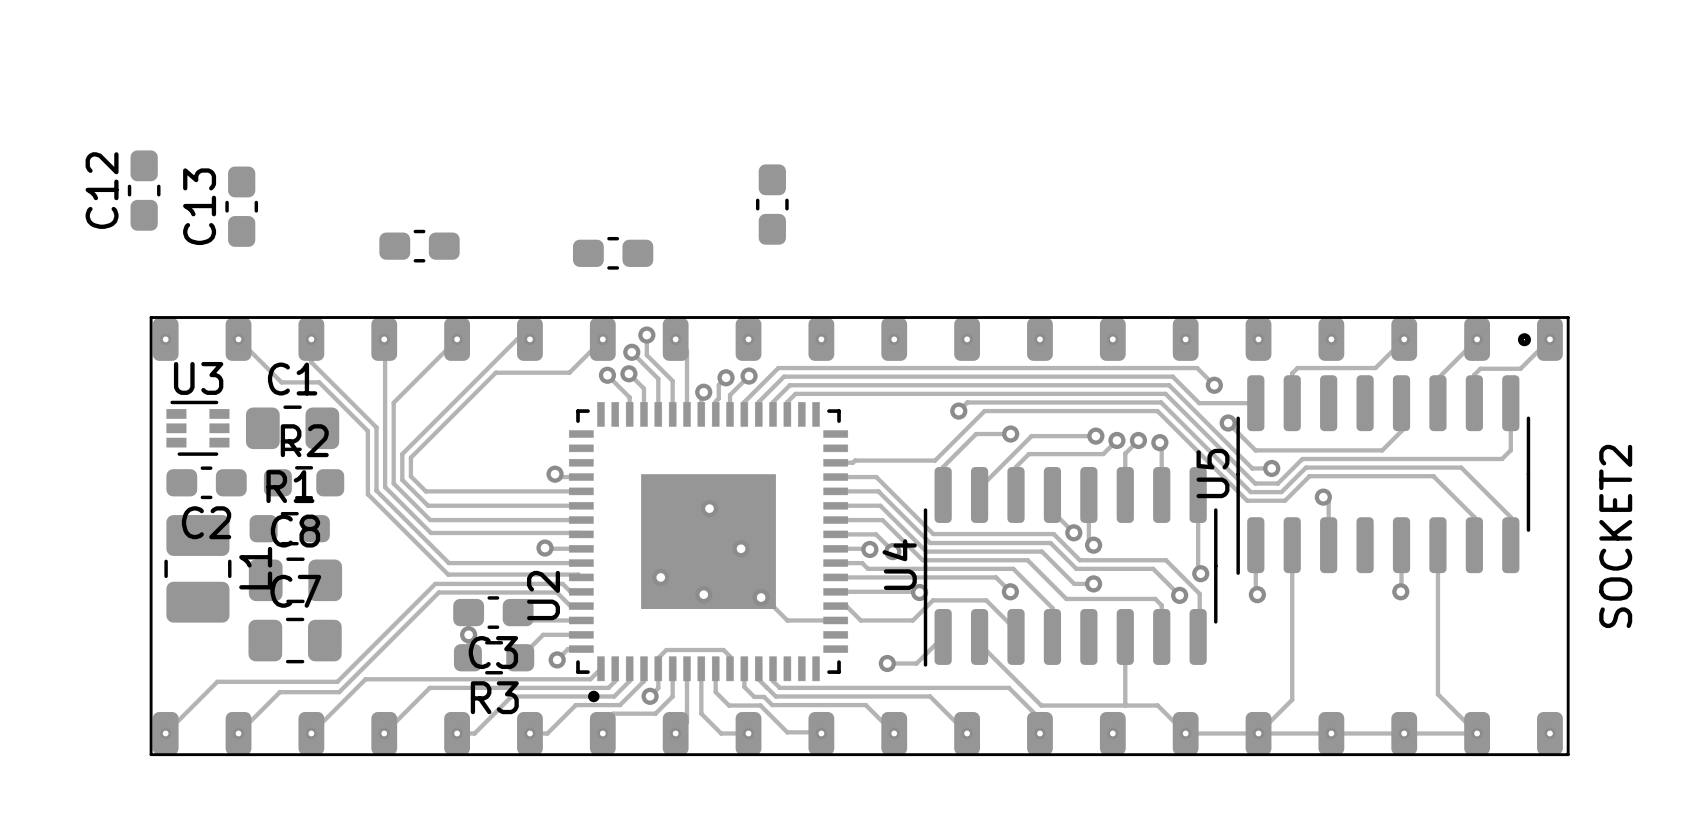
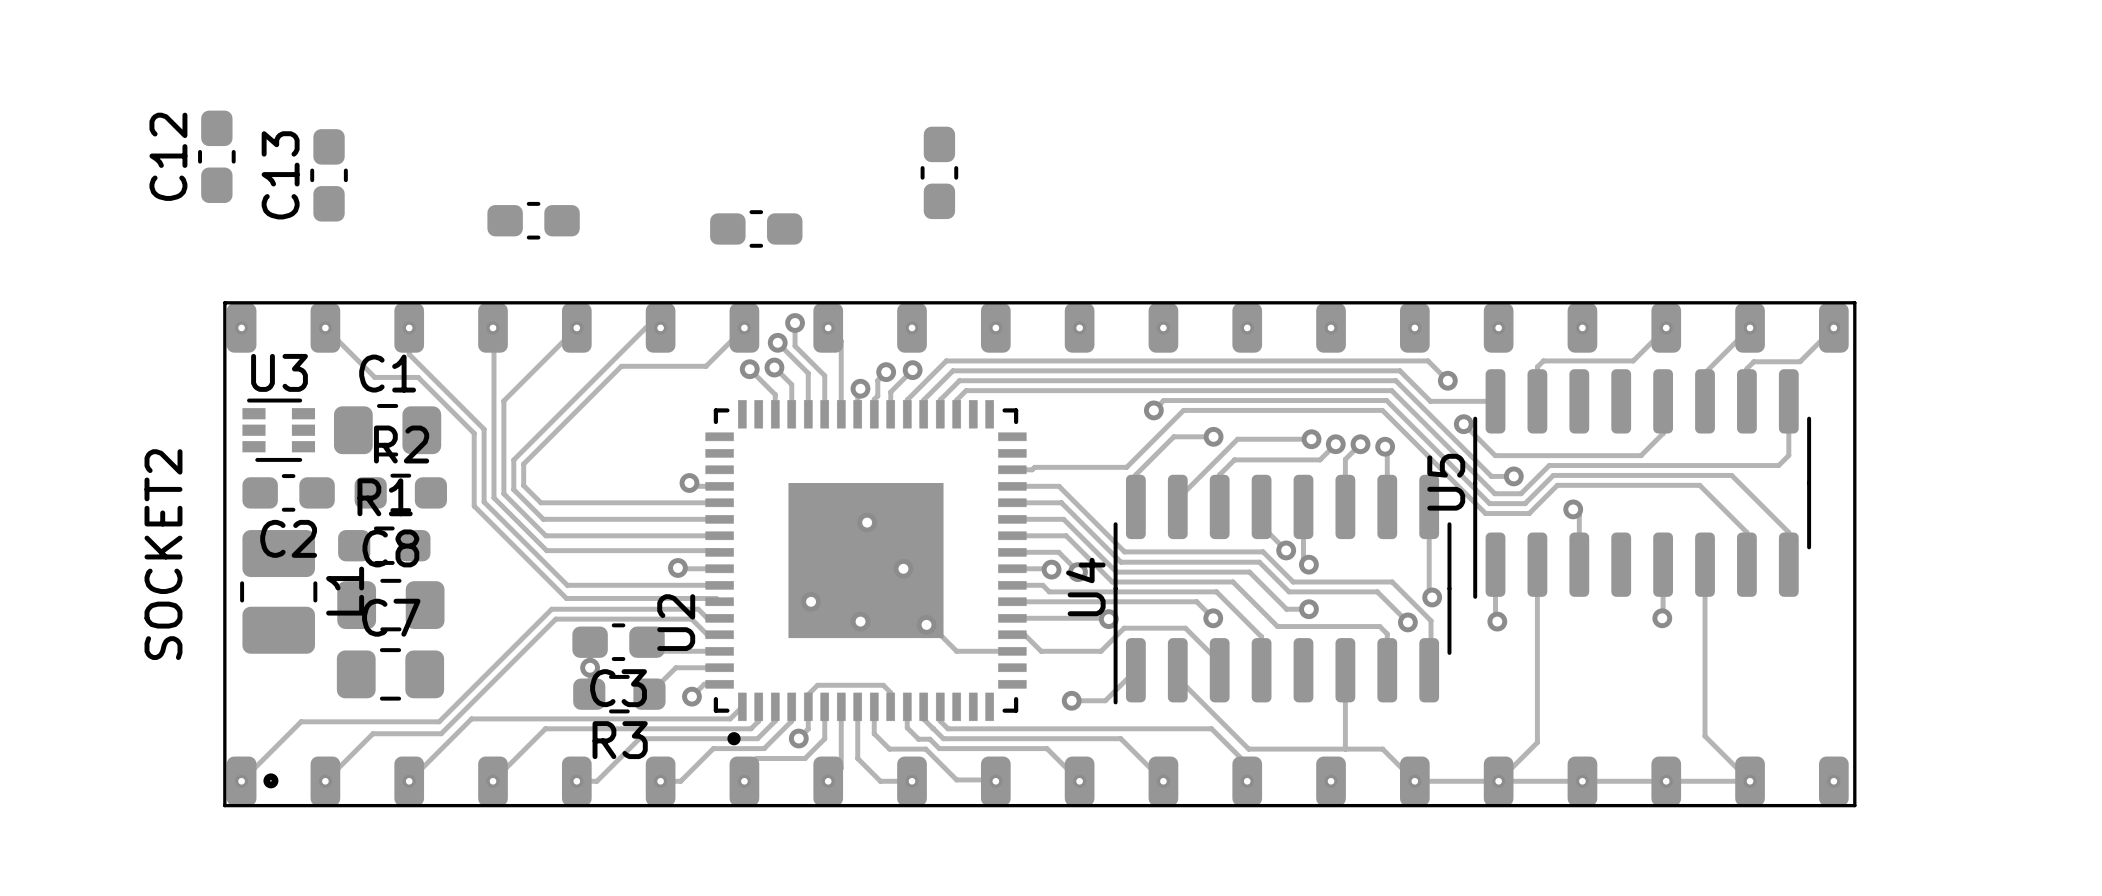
SOCKET2 rotation: 0° (857, 536) -> 180° (1037, 554)

